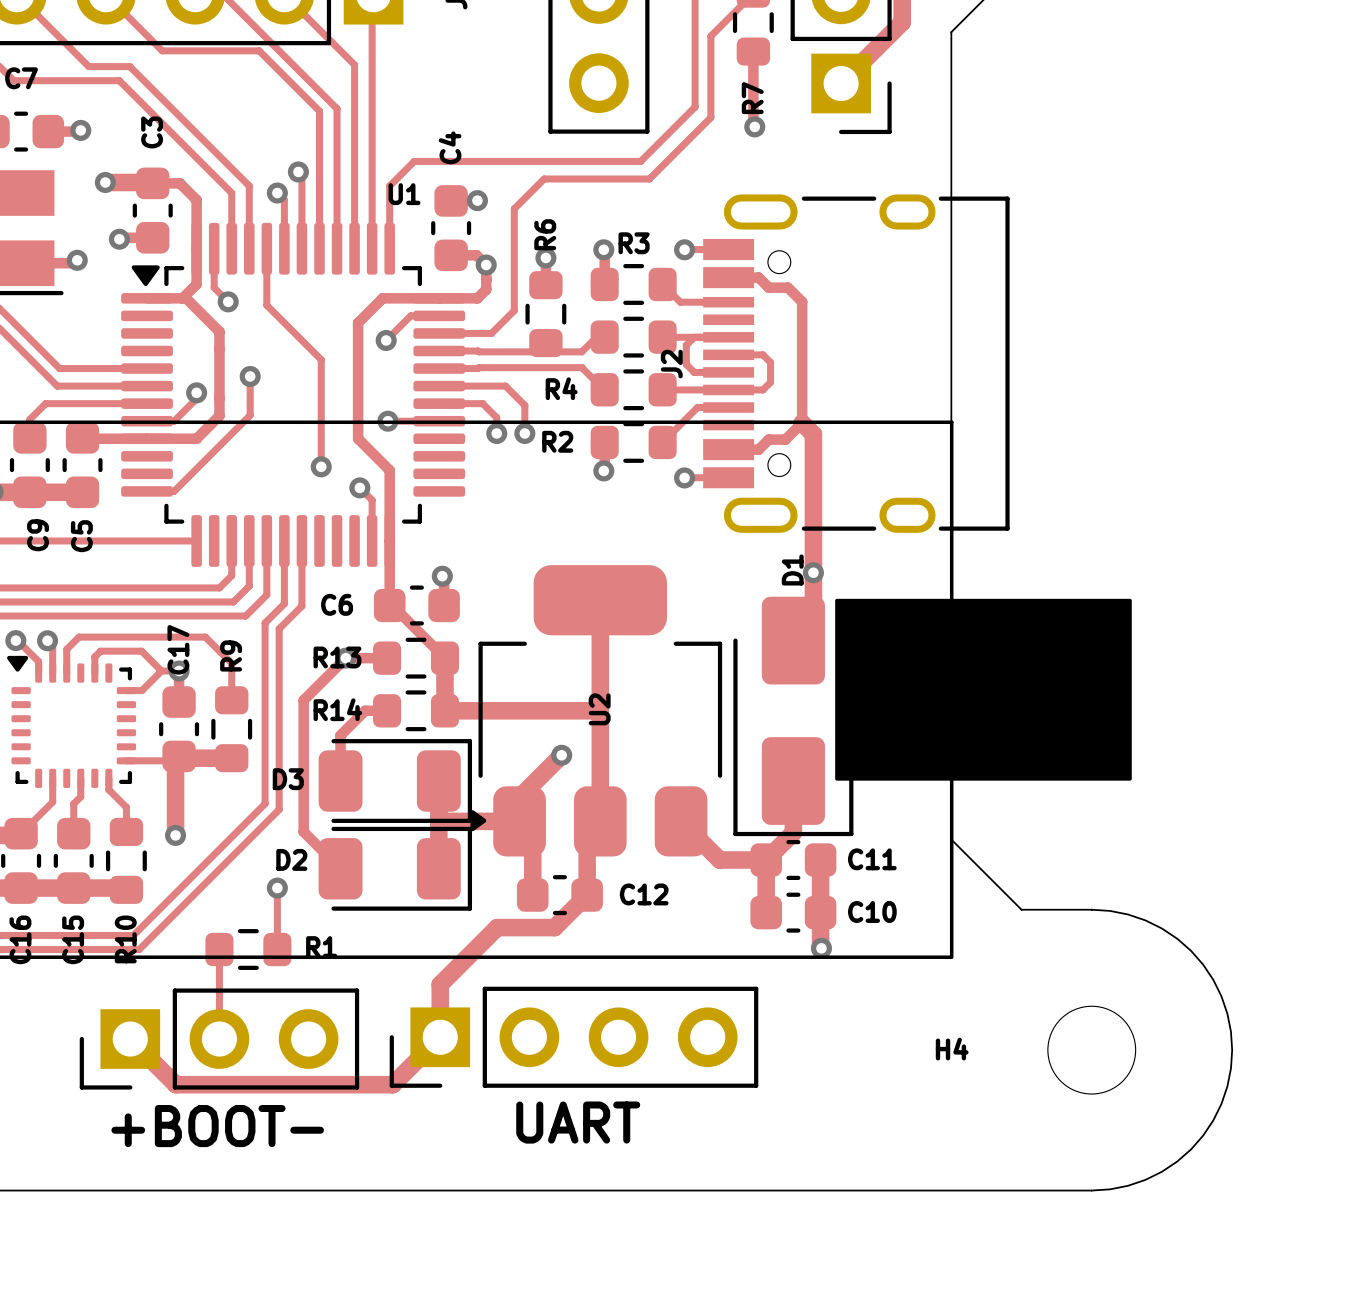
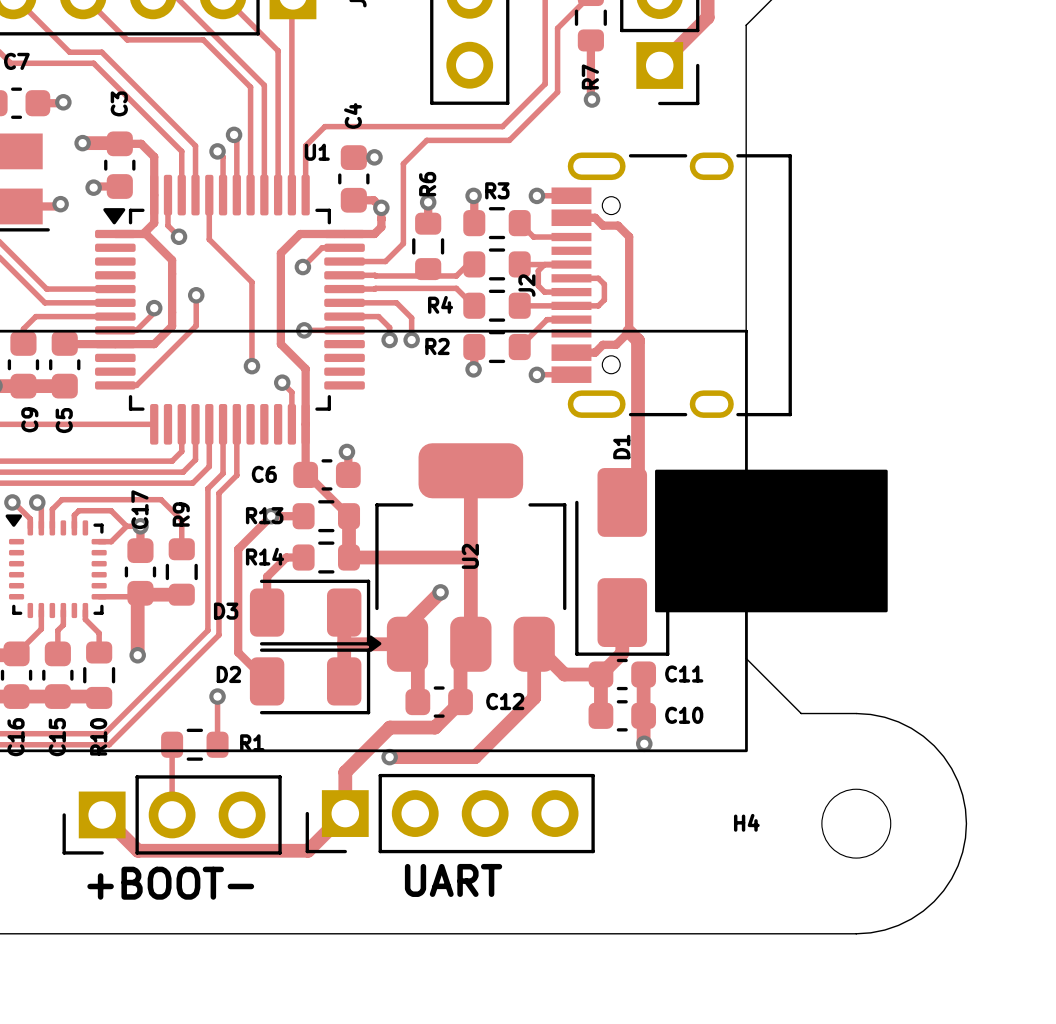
via: (813, 572) -> none
track: none -> (534, 644) (534, 697) (474, 757) (389, 757)
via: none -> (389, 757)

